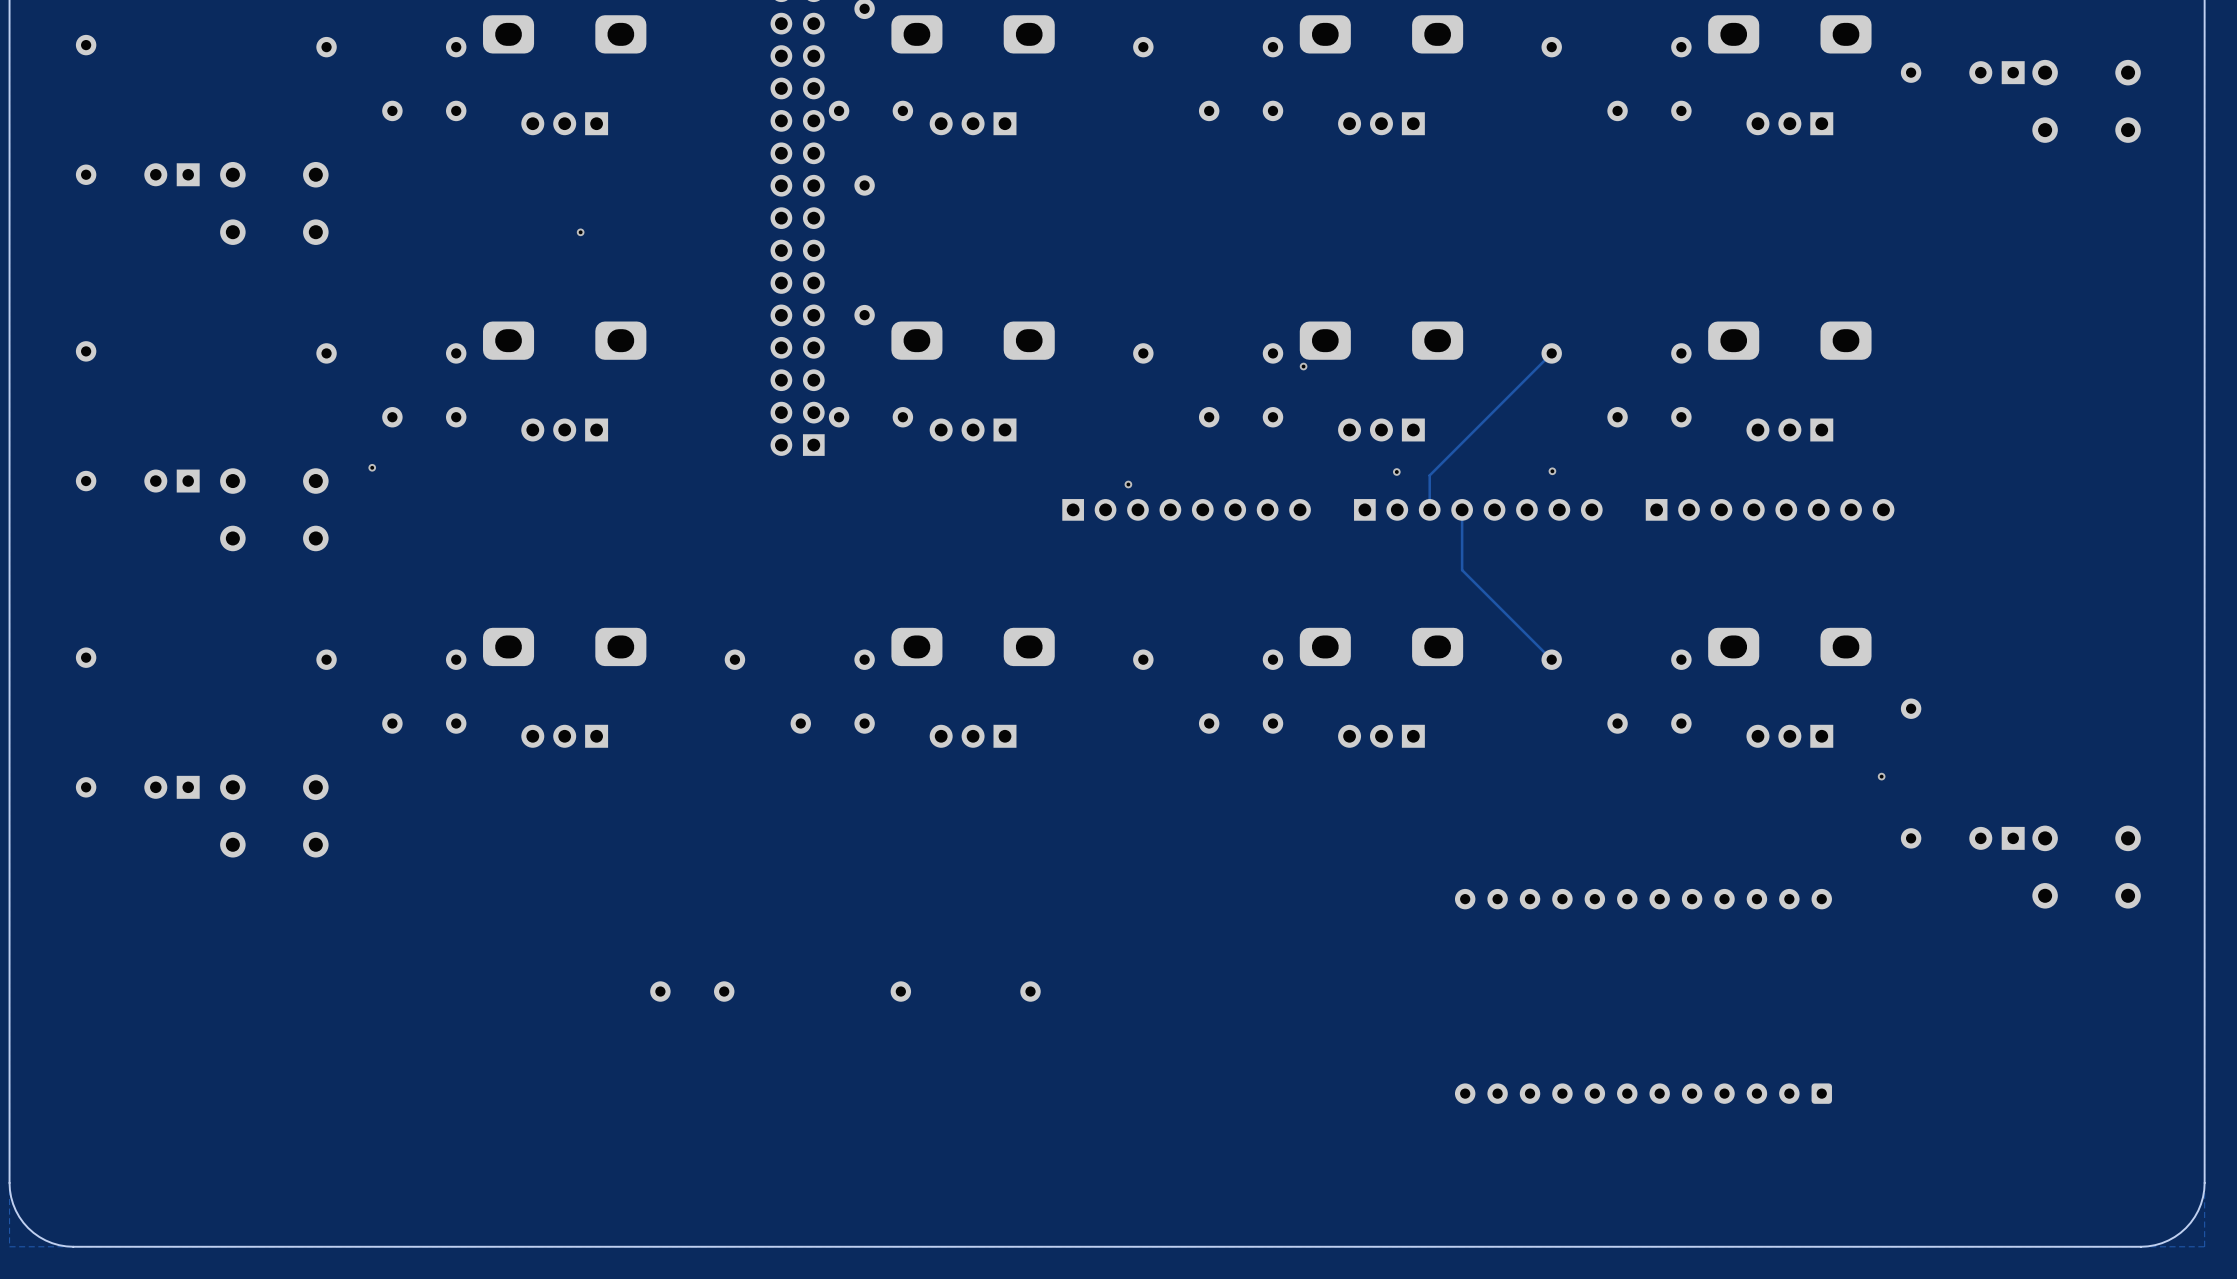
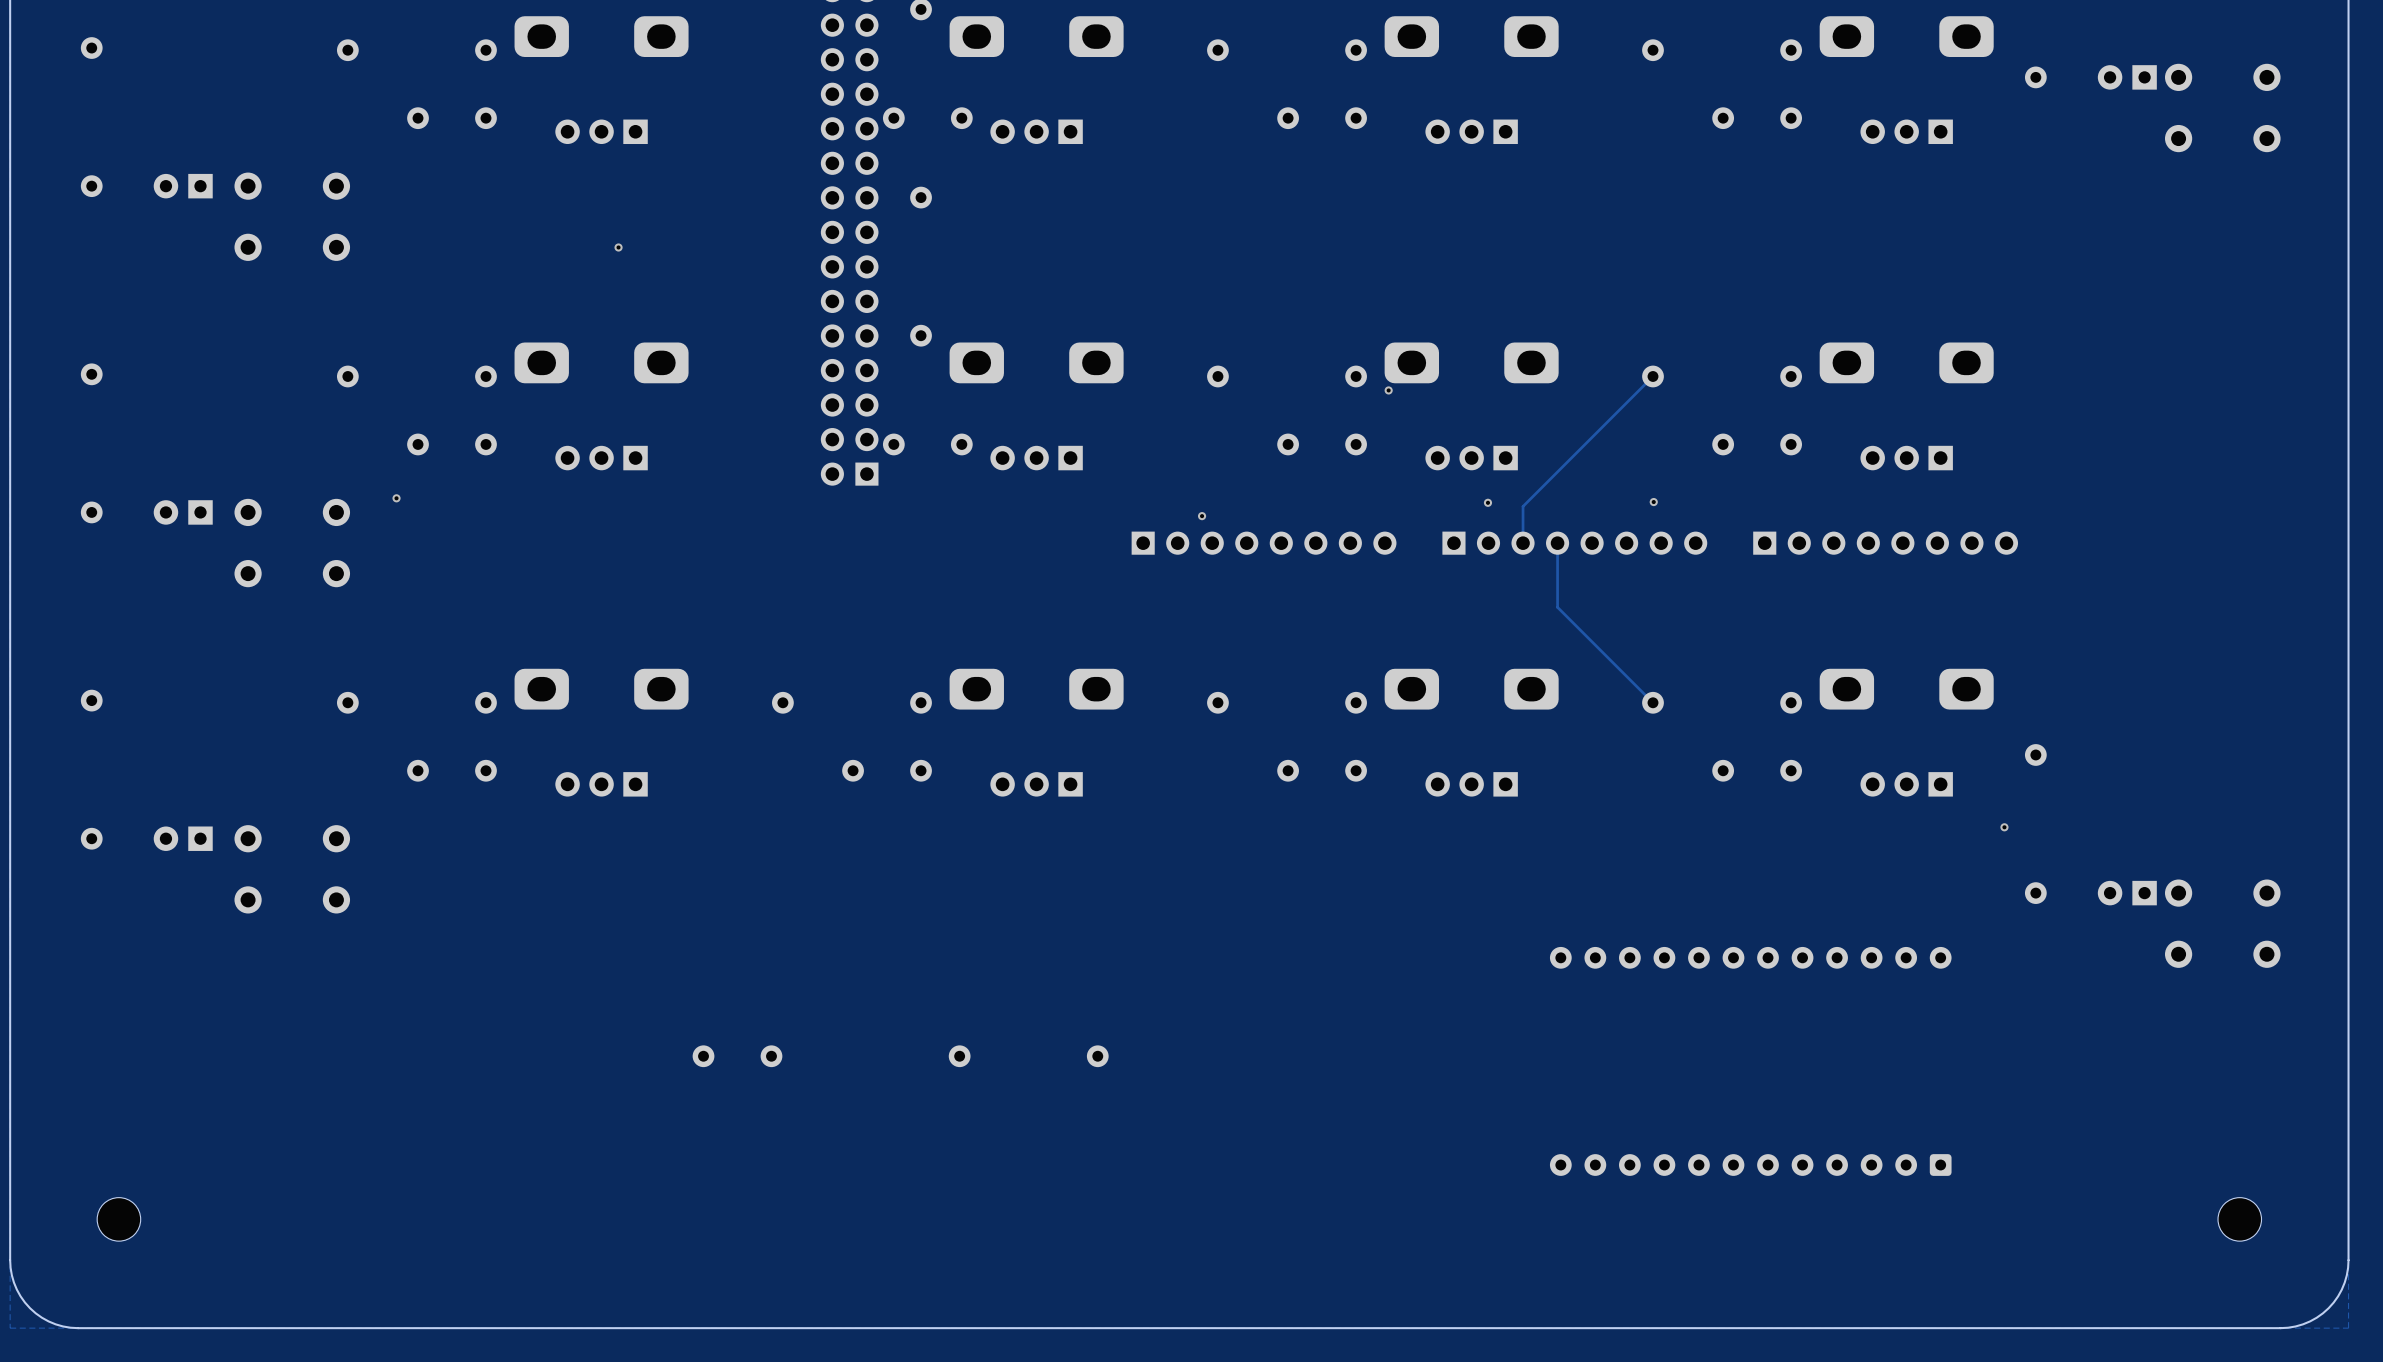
part: none -> (118, 1219)
part: none -> (2239, 1219)

